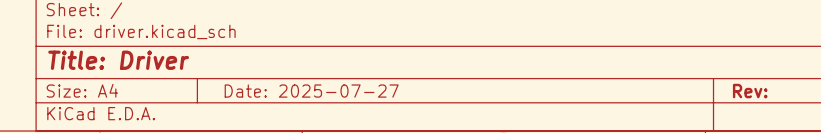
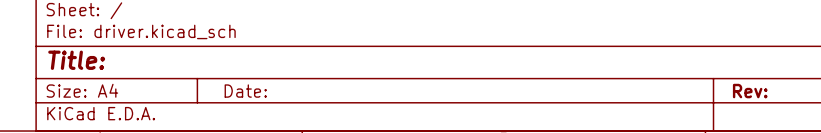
title block: Title: Driver (118, 60) -> Title: (76, 60)
title block: Date: 2025-07-27 (311, 91) -> Date: (245, 91)

